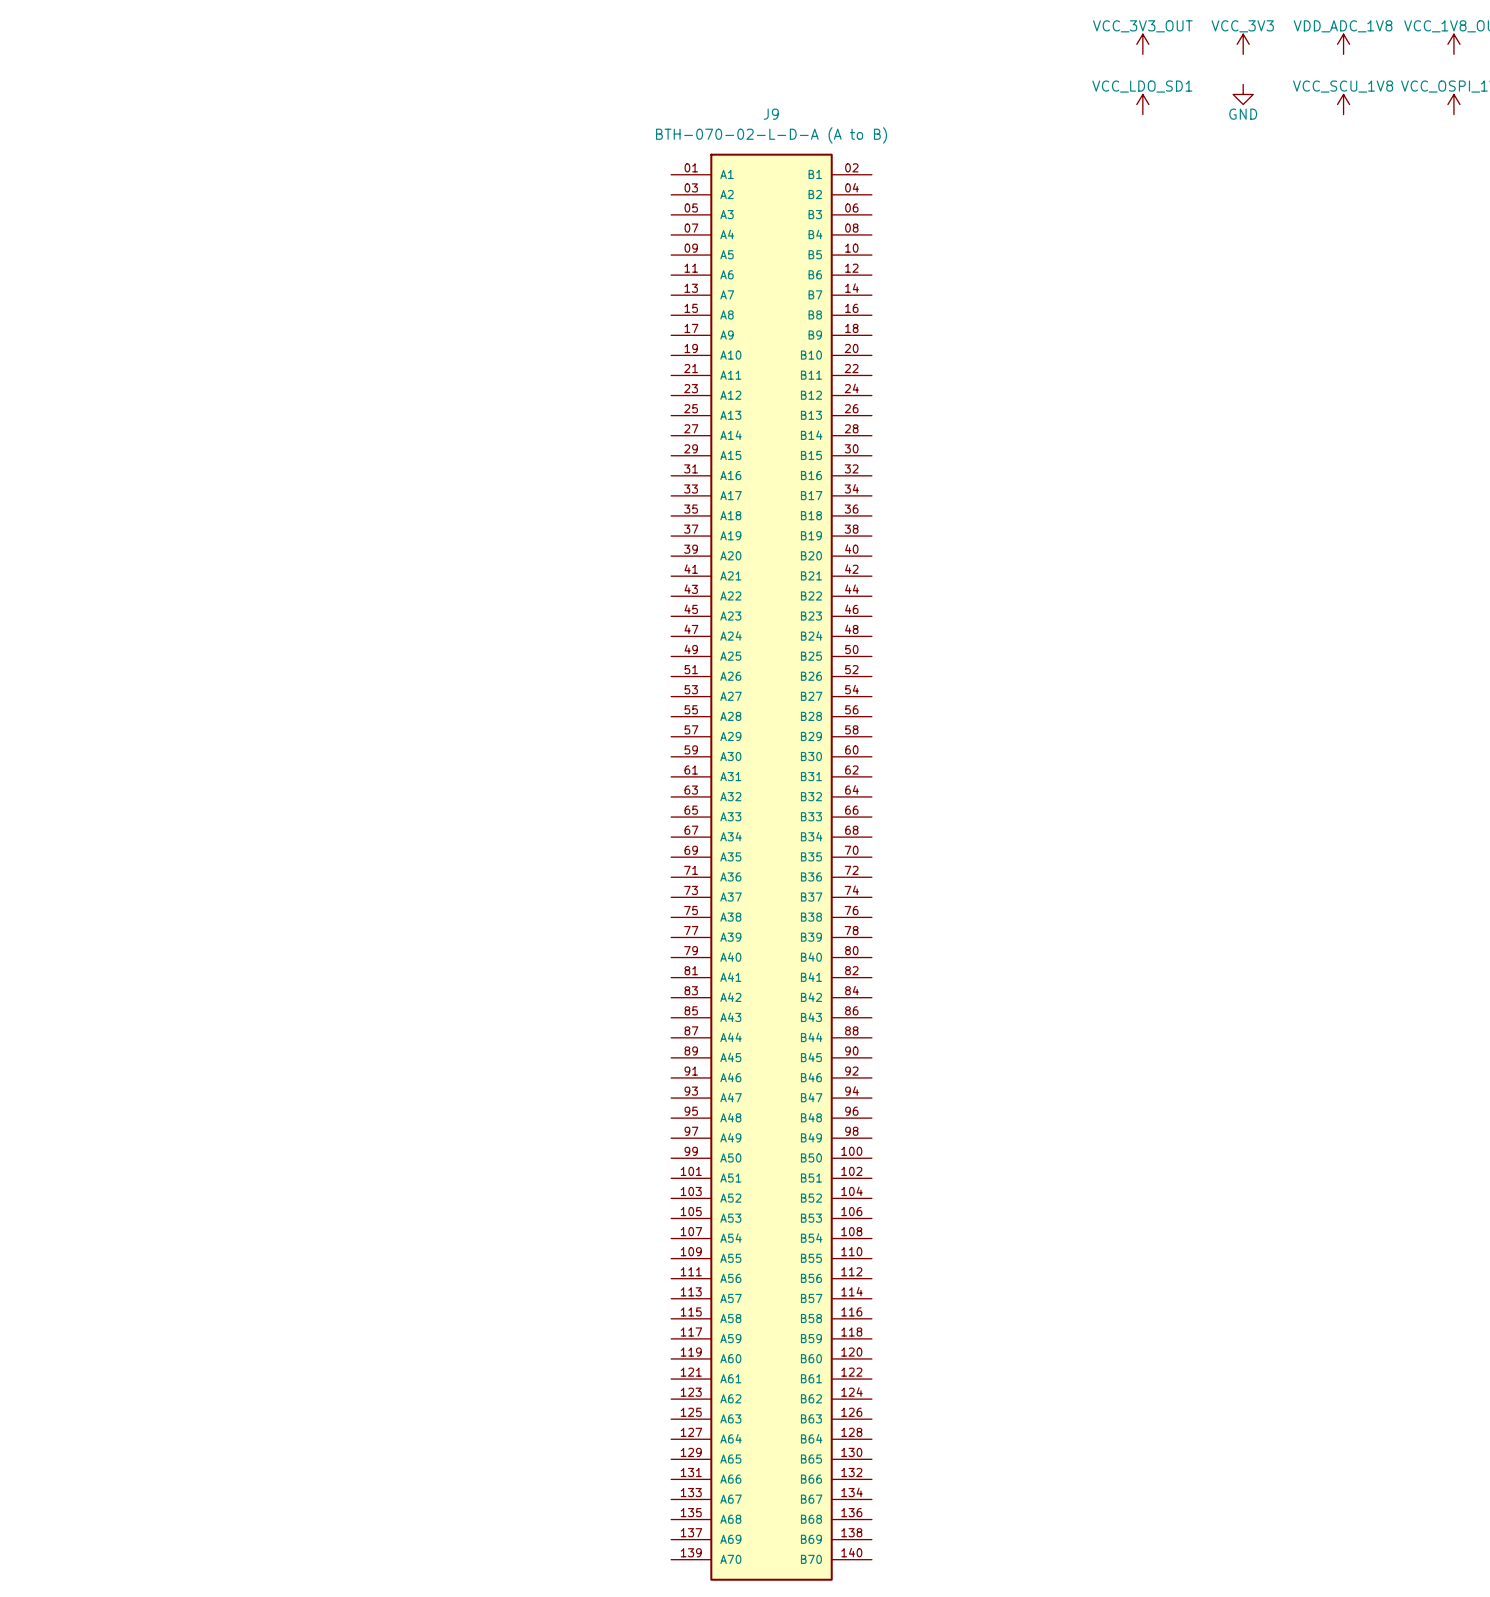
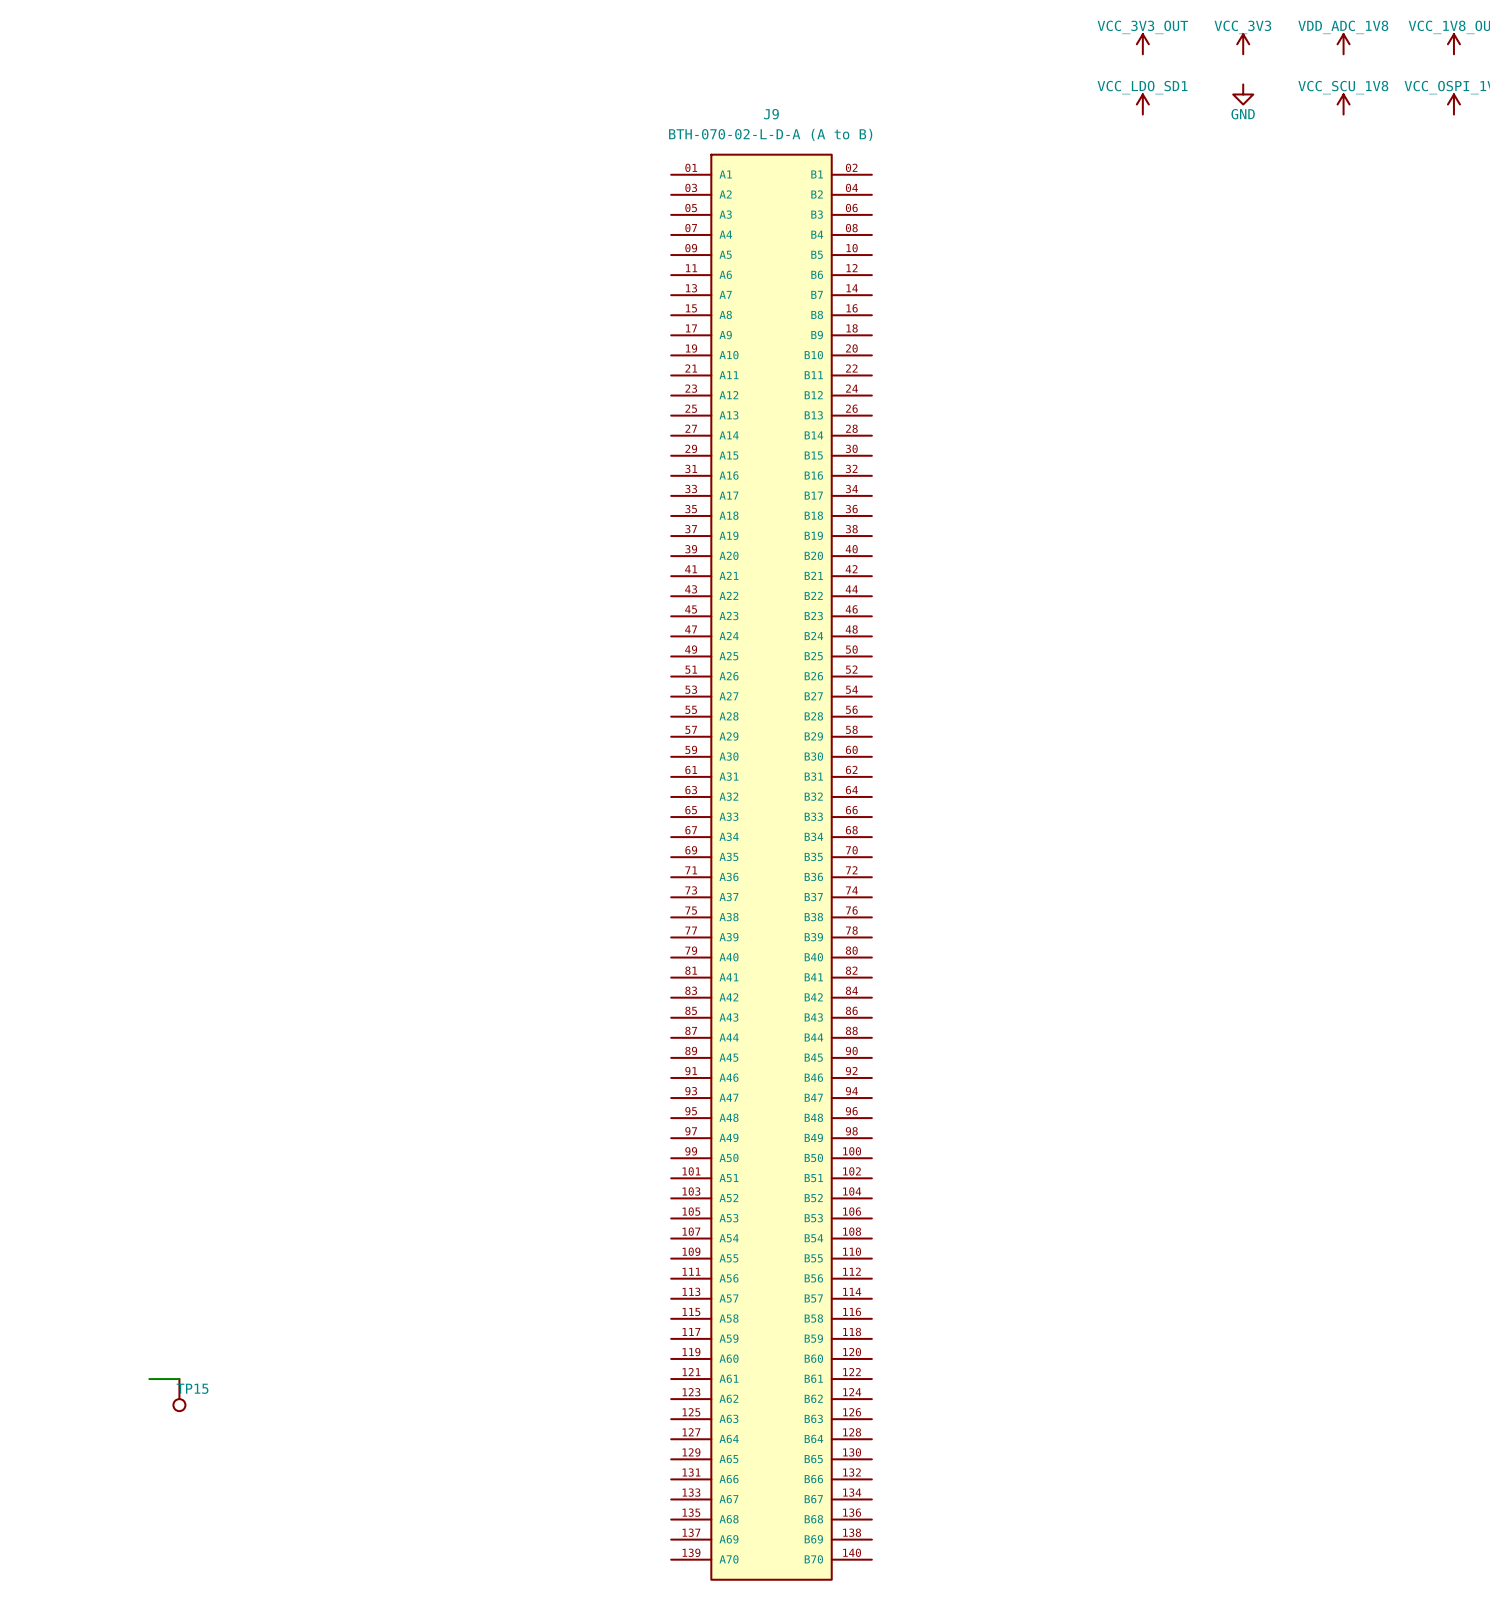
wire: none -> (149, 1379) (179, 1379)
TP15: none -> (179, 1395)

